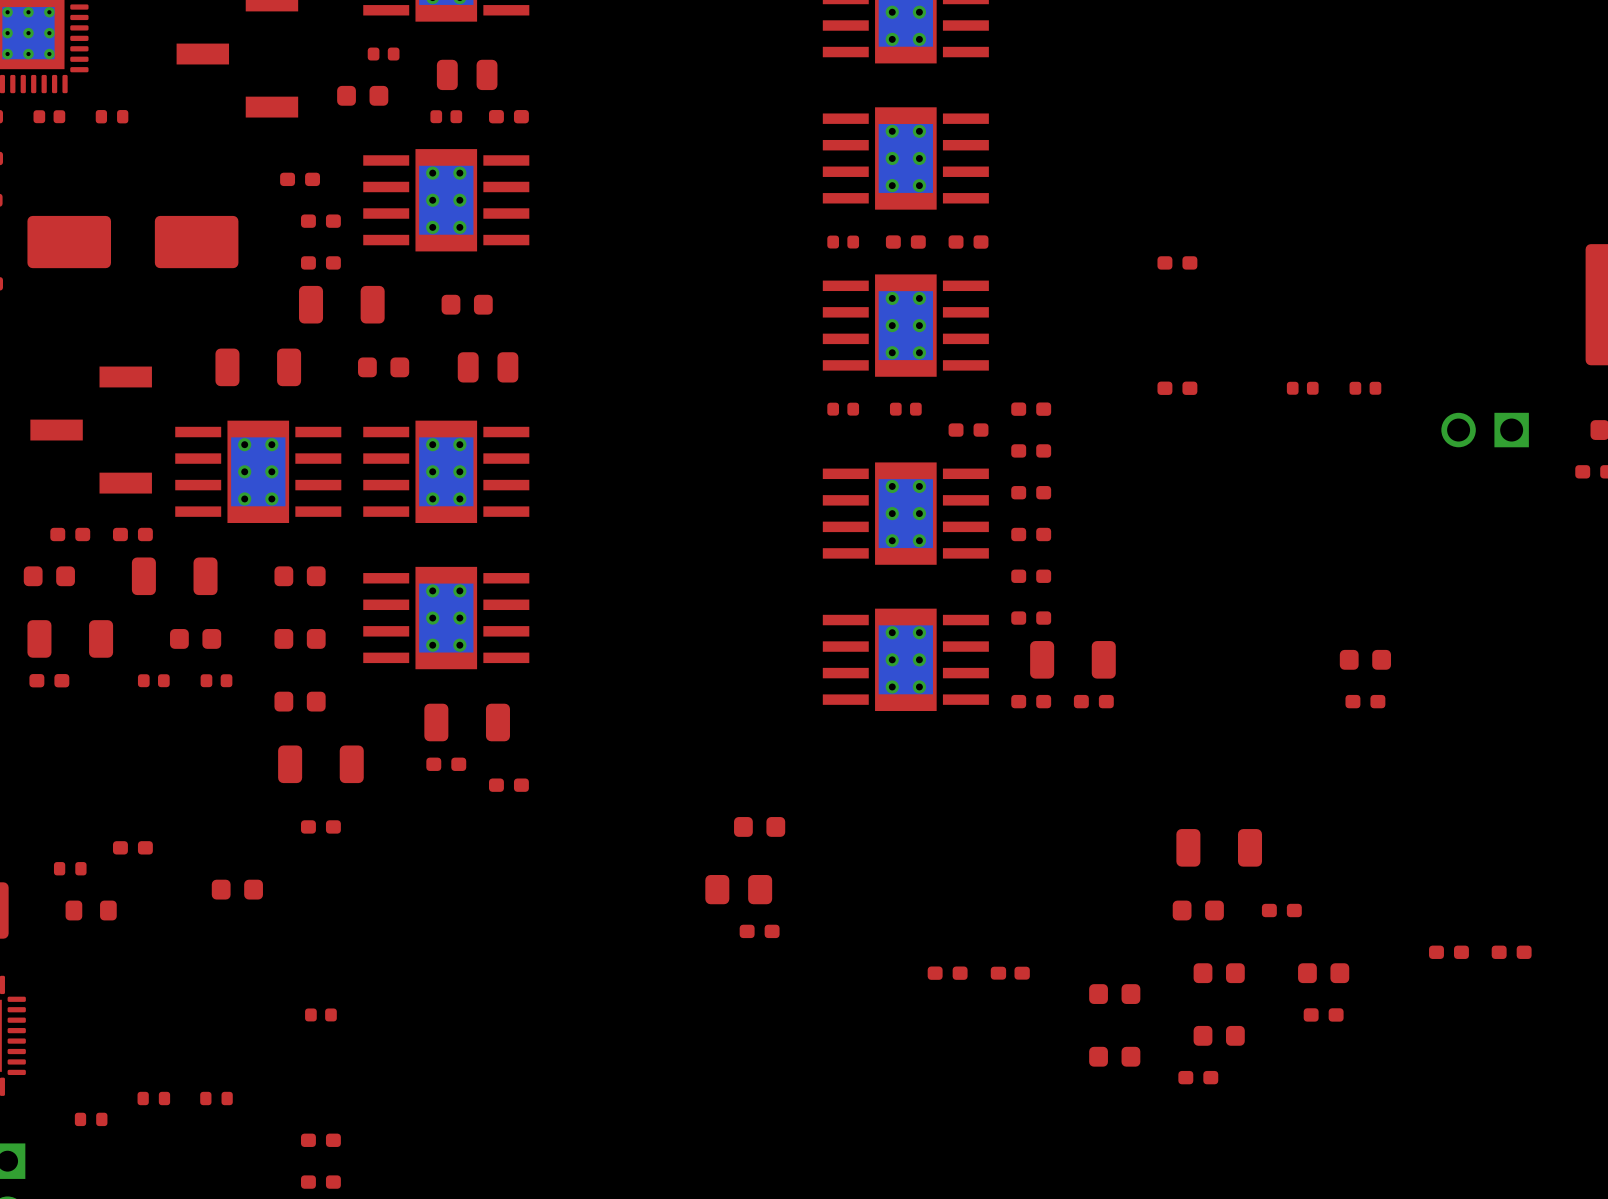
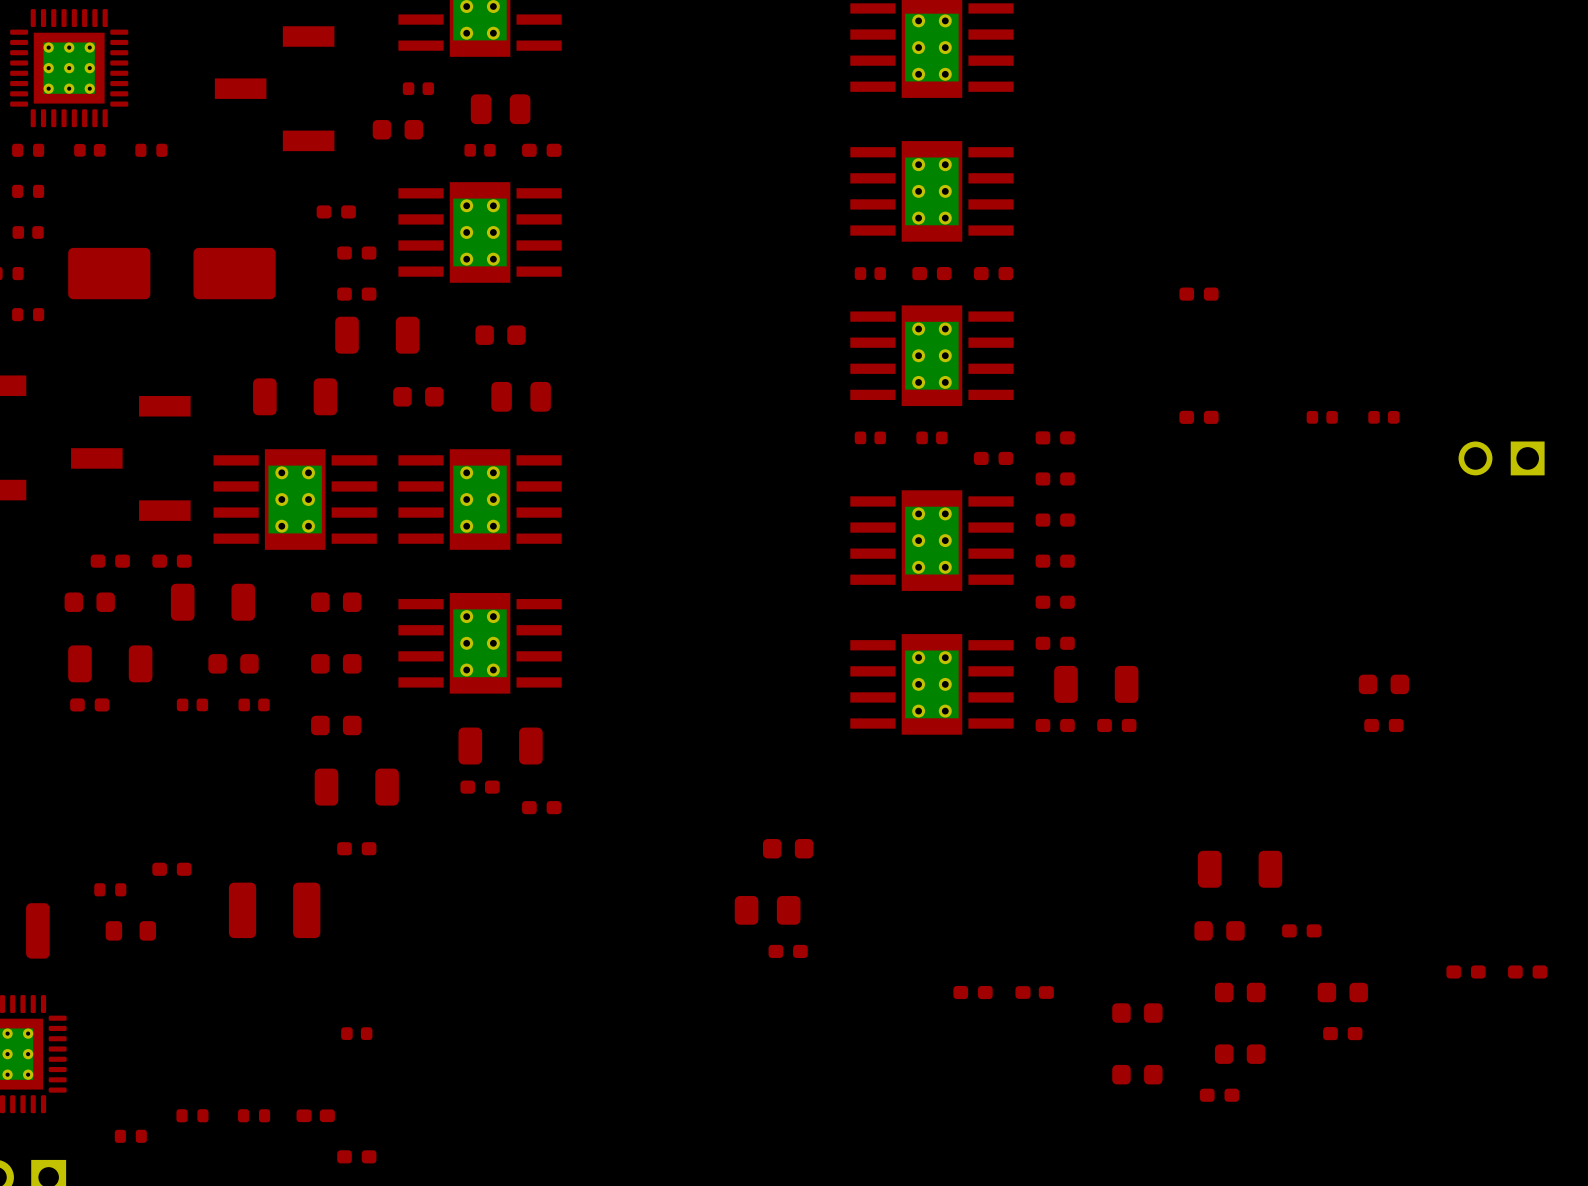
part footprint: [211, 879, 263, 900] -> [228, 882, 321, 939]
part: none -> (315, 1115)

